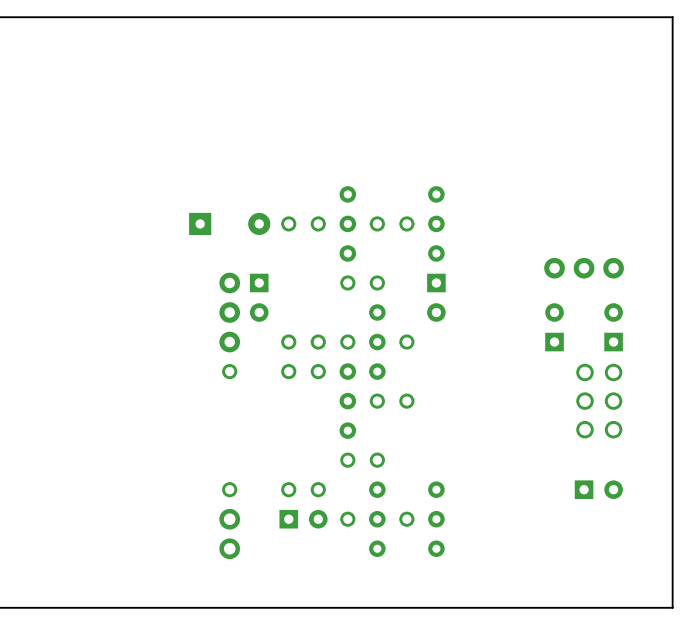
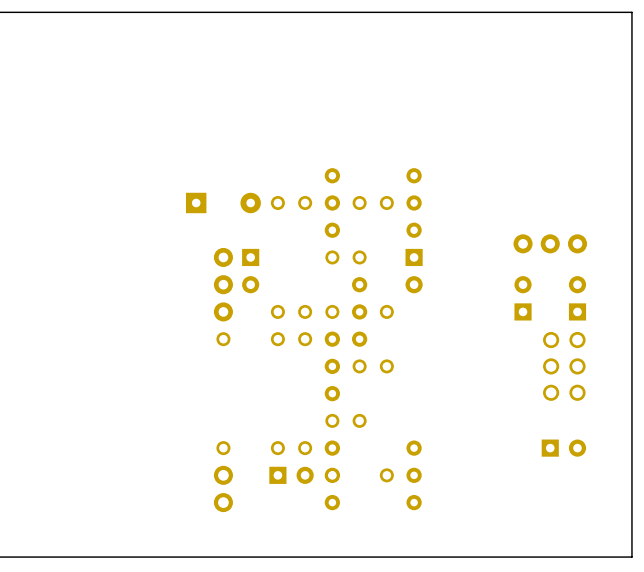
part position: (377, 519) -> (332, 475)

